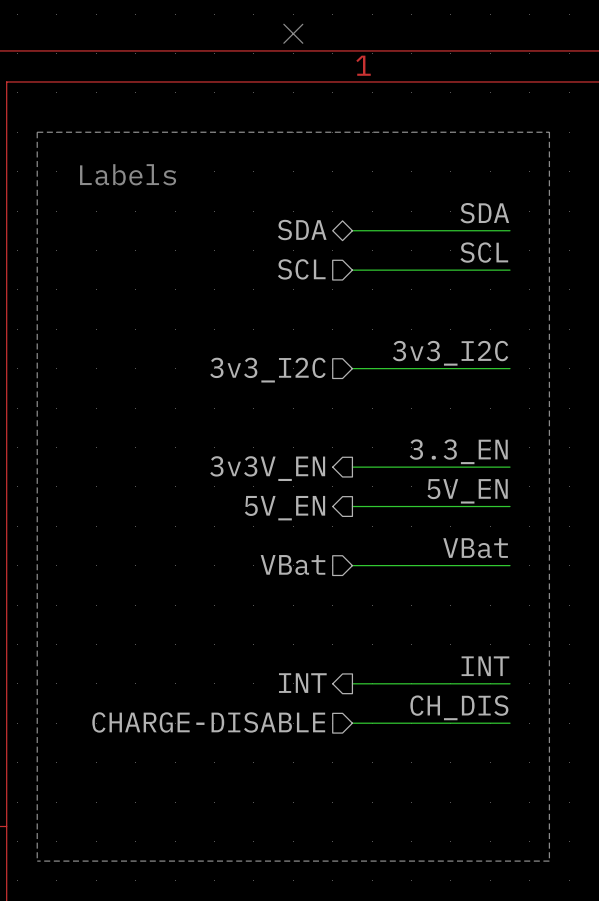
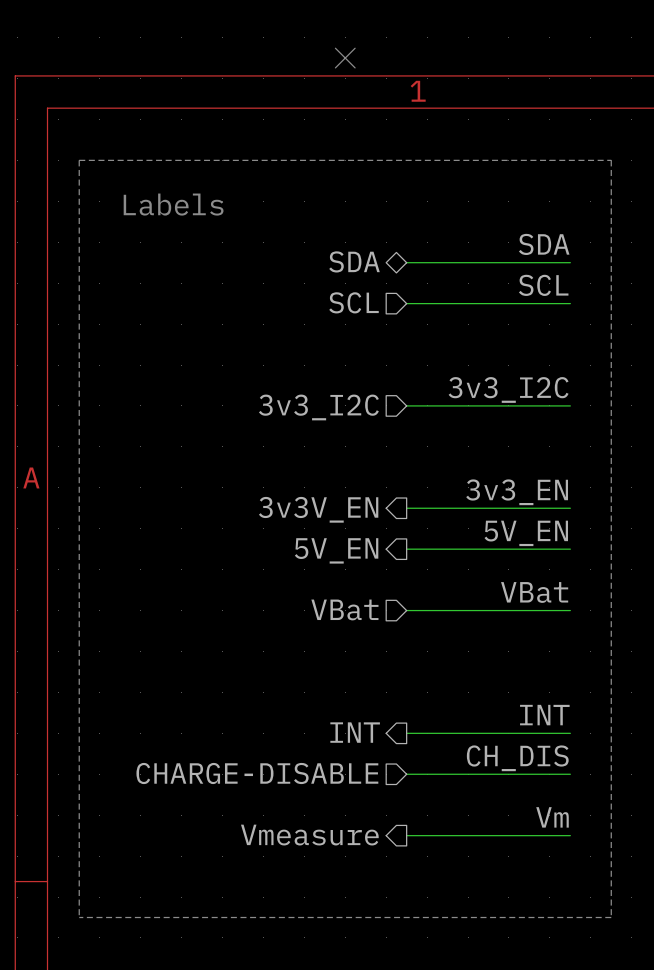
label: 3.3_EN (458, 451) -> 3v3_EN (517, 492)
label: none -> Vm (552, 817)
hierarchical label: none -> Vmeasure (309, 835)
wire: none -> (406, 835) (570, 835)

